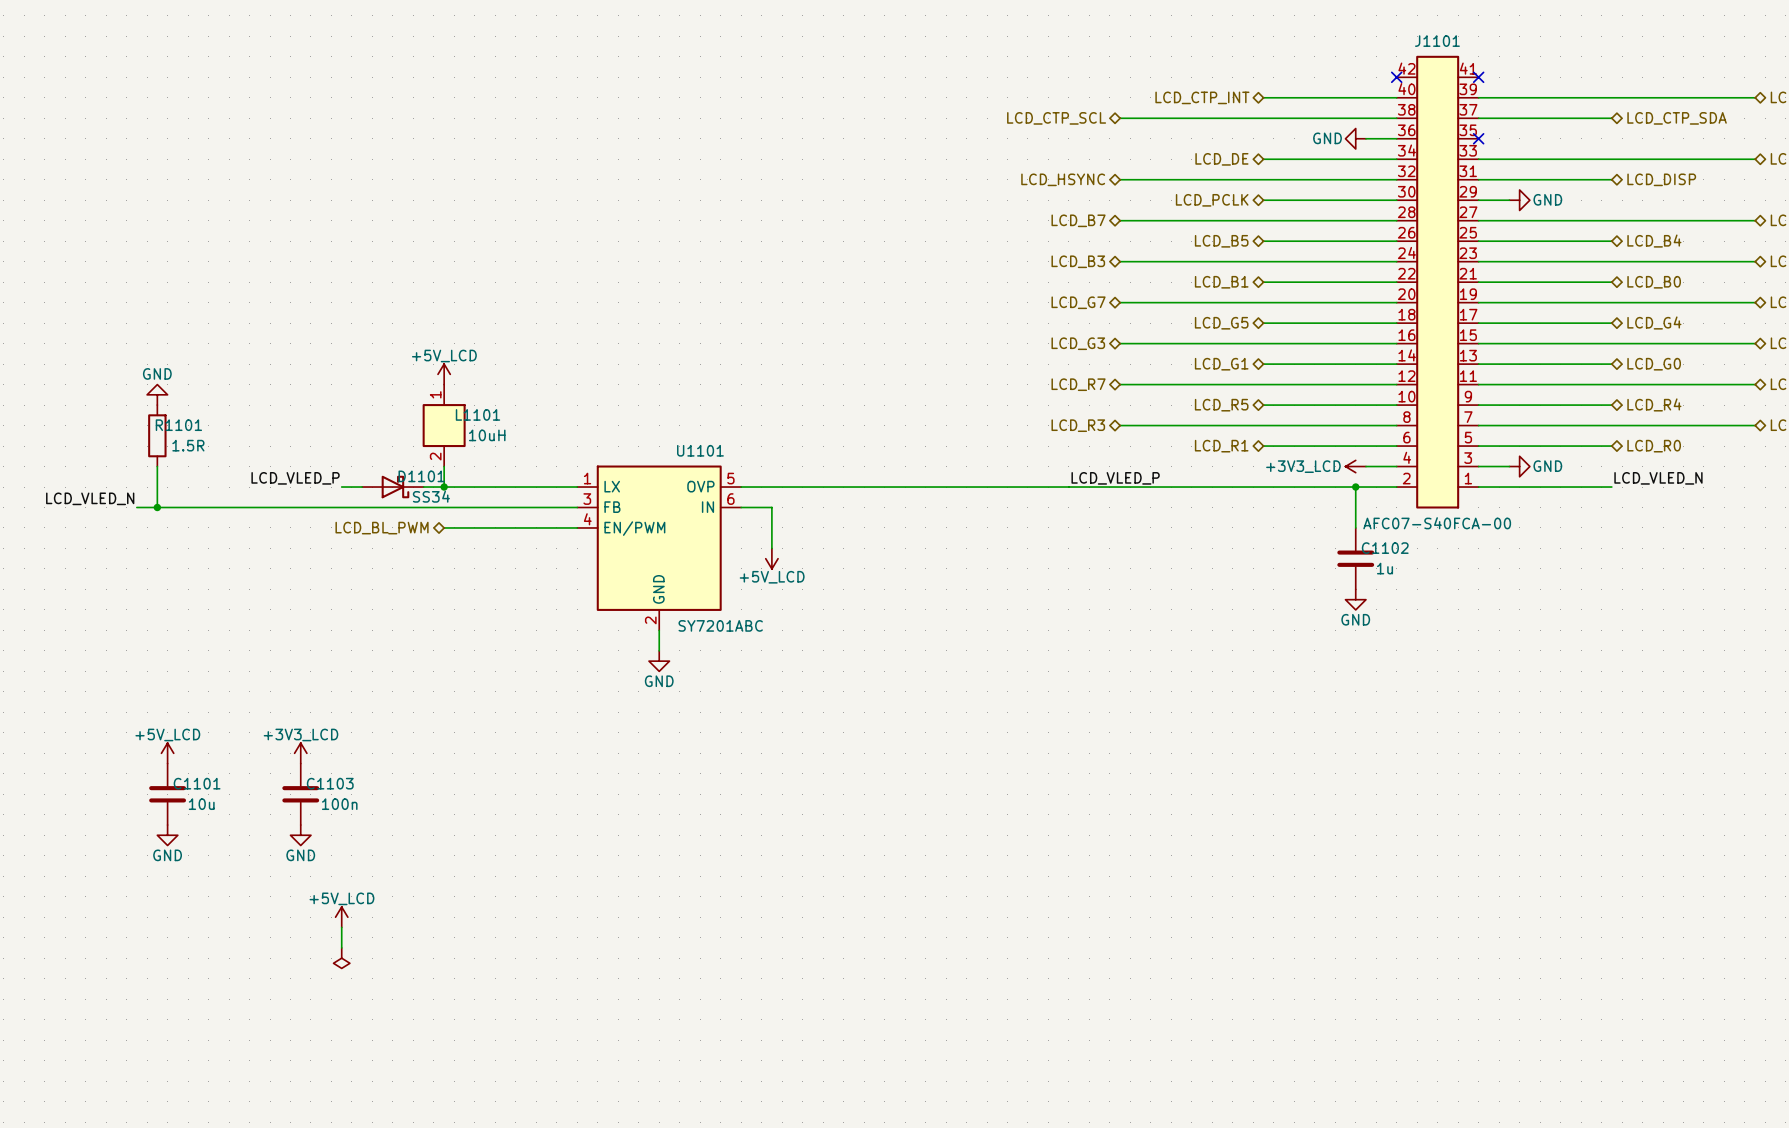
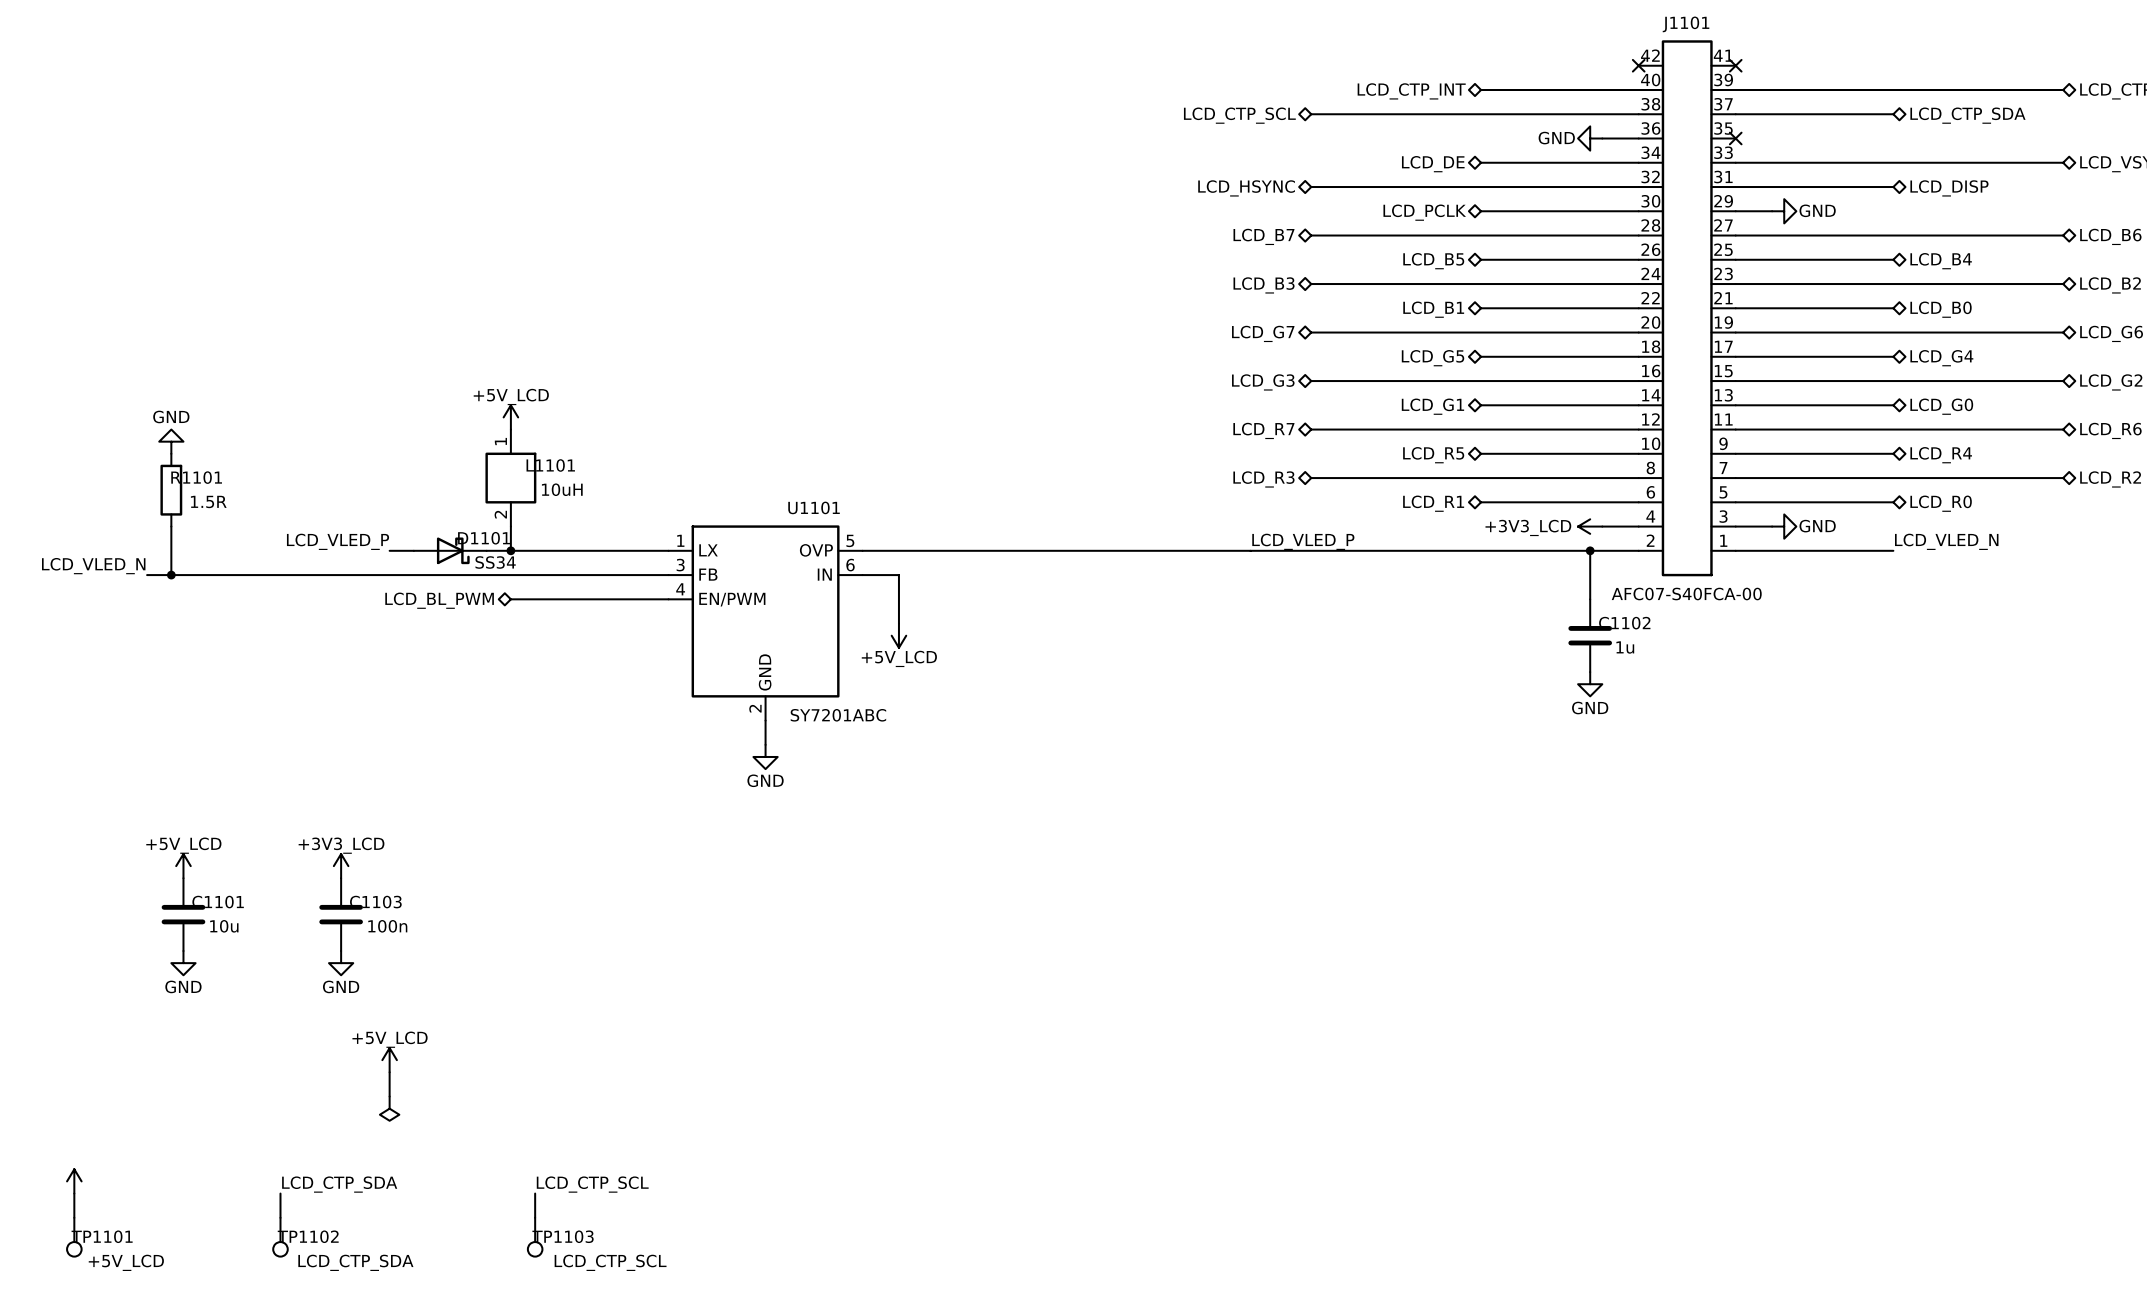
power symbol: none -> (74, 1181)
label: none -> LCD_CTP_SDA (339, 1184)
label: none -> LCD_CTP_SCL (592, 1184)
wire: none -> (74, 1193) (74, 1217)
wire: none -> (280, 1193) (280, 1217)
wire: none -> (535, 1193) (535, 1217)
TP1101: none -> +5V_LCD (74, 1237)
TP1102: none -> LCD_CTP_SDA (280, 1237)
TP1103: none -> LCD_CTP_SCL (535, 1237)

